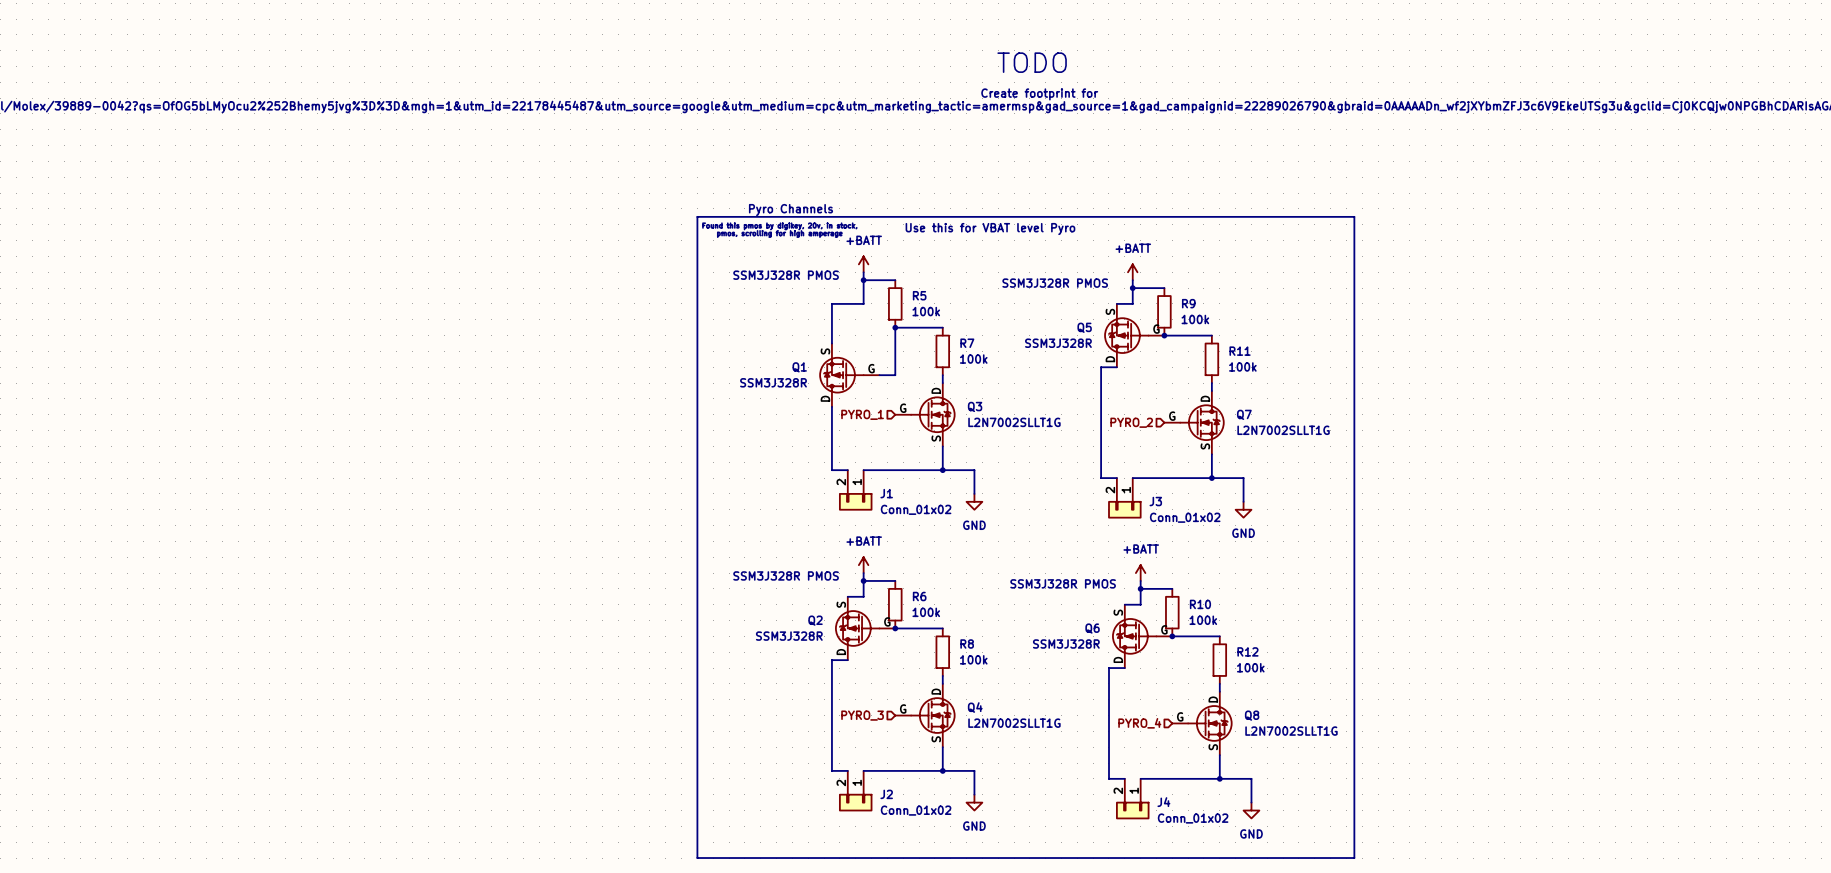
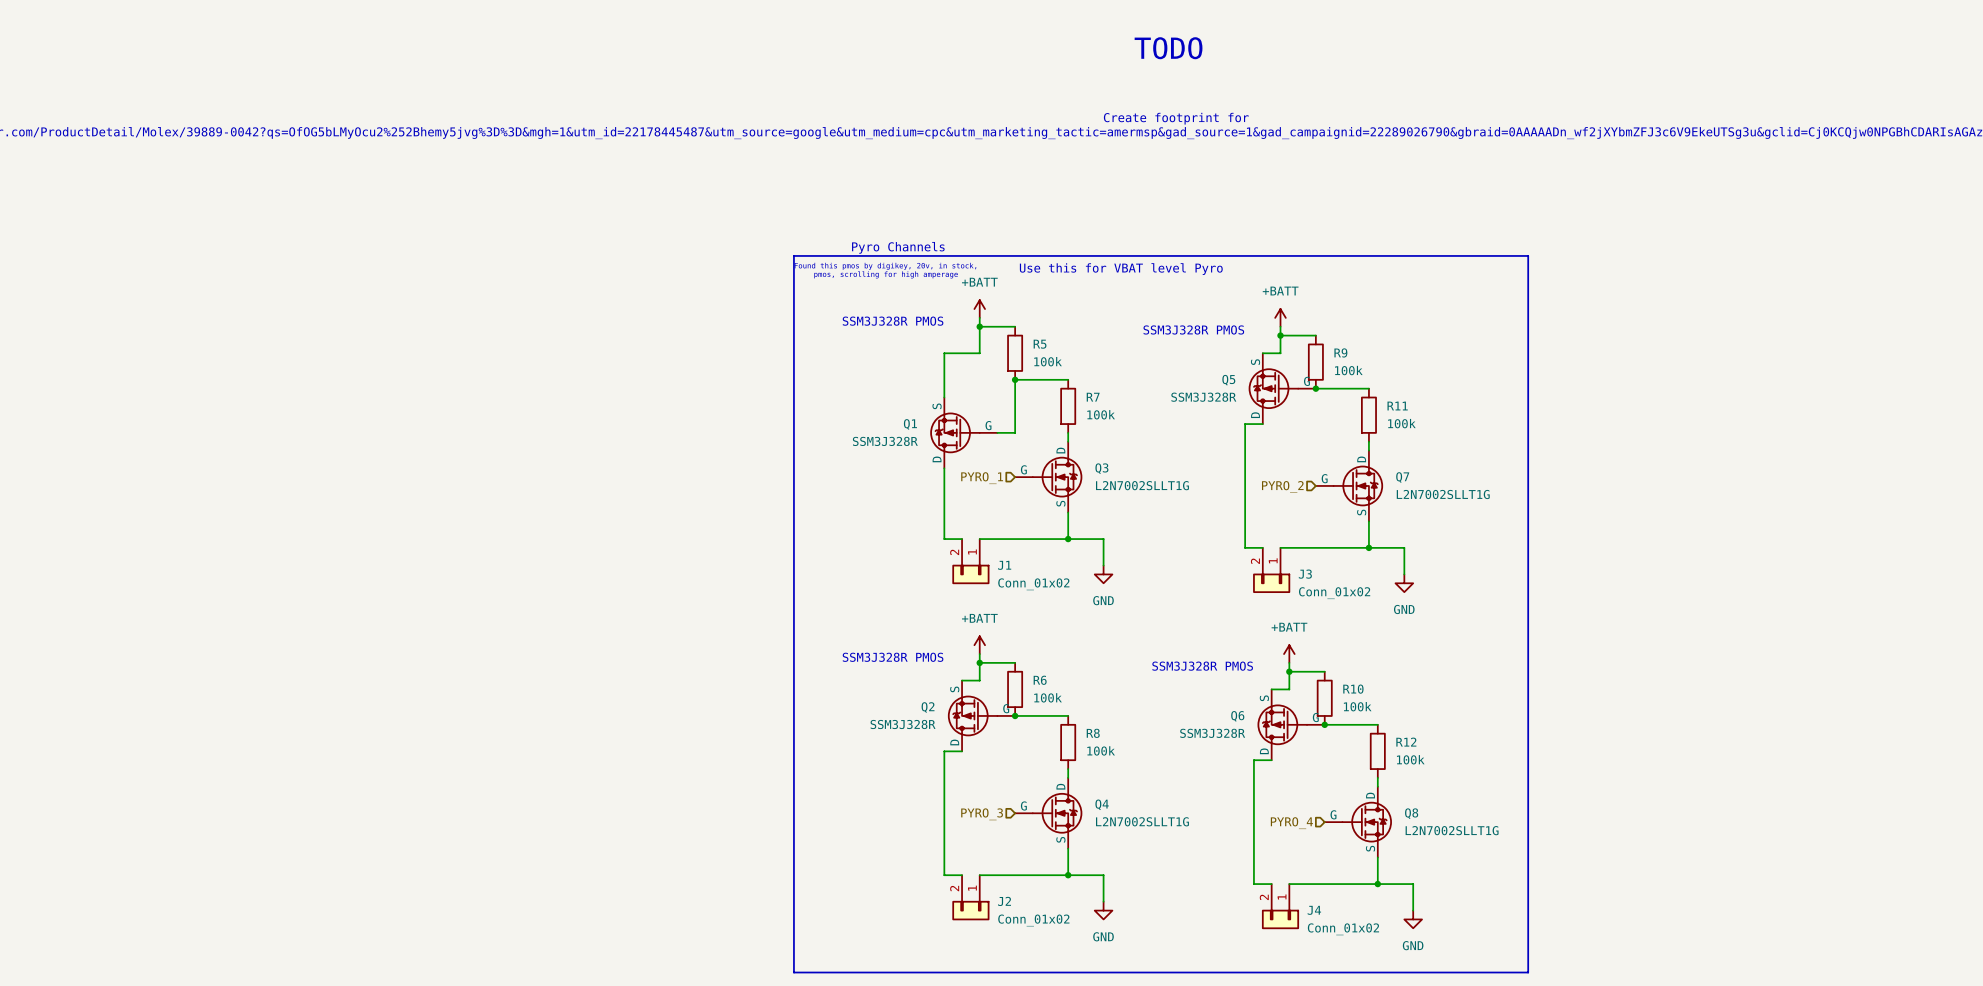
text position: TODO (1032, 62) -> TODO (1168, 48)

